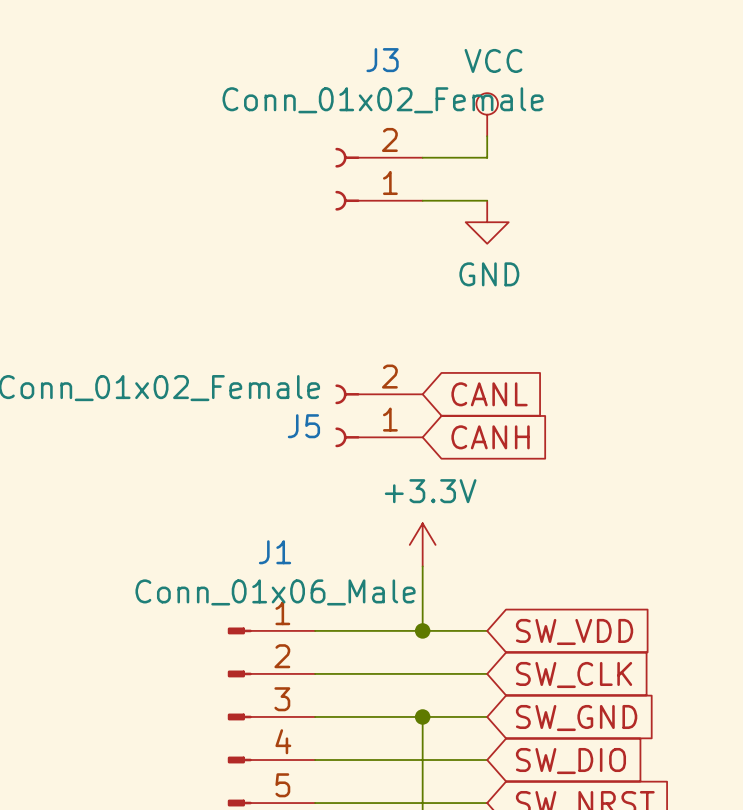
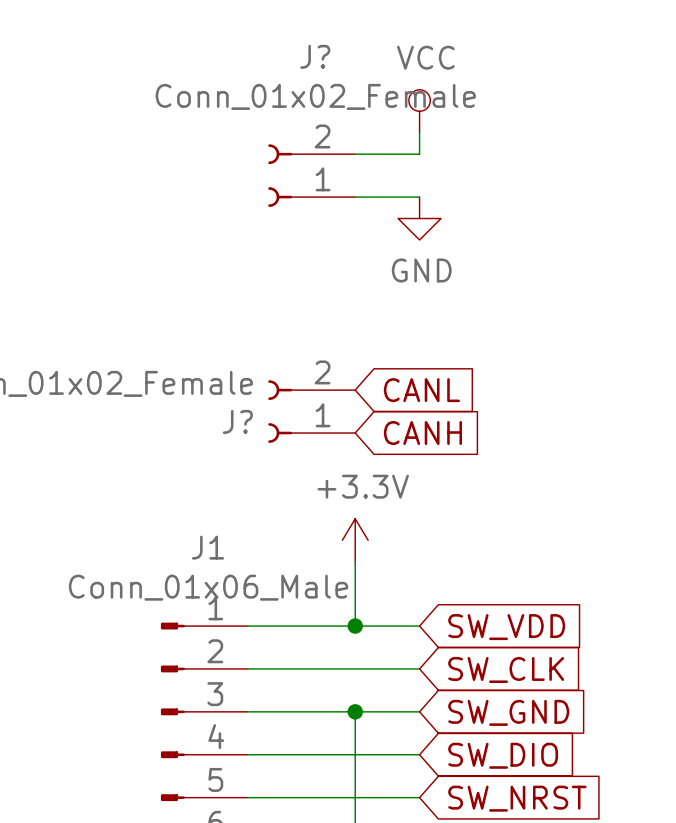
J3 name: J3 (382, 60) -> J? (315, 56)
J5 name: J5 (303, 426) -> J? (237, 421)

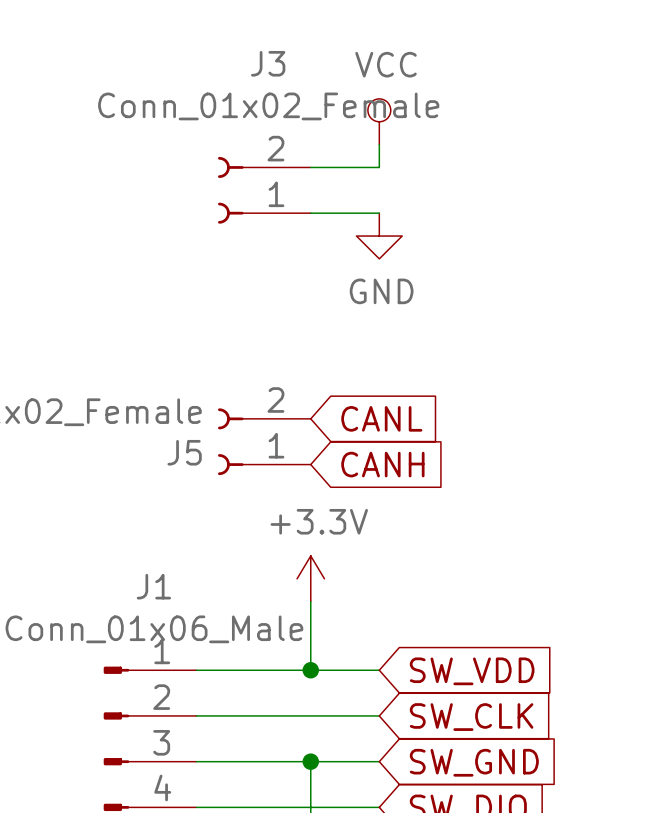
J? name: J? (315, 56) -> J3 (268, 63)
J? name: J? (237, 421) -> J5 (184, 452)

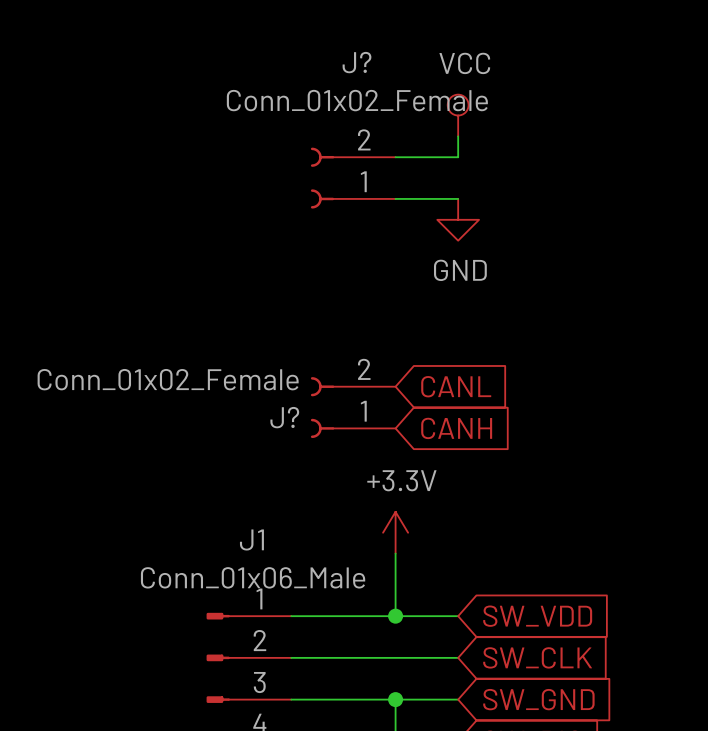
J3 name: J3 (268, 63) -> J? (356, 62)
J5 name: J5 (184, 452) -> J? (284, 417)

